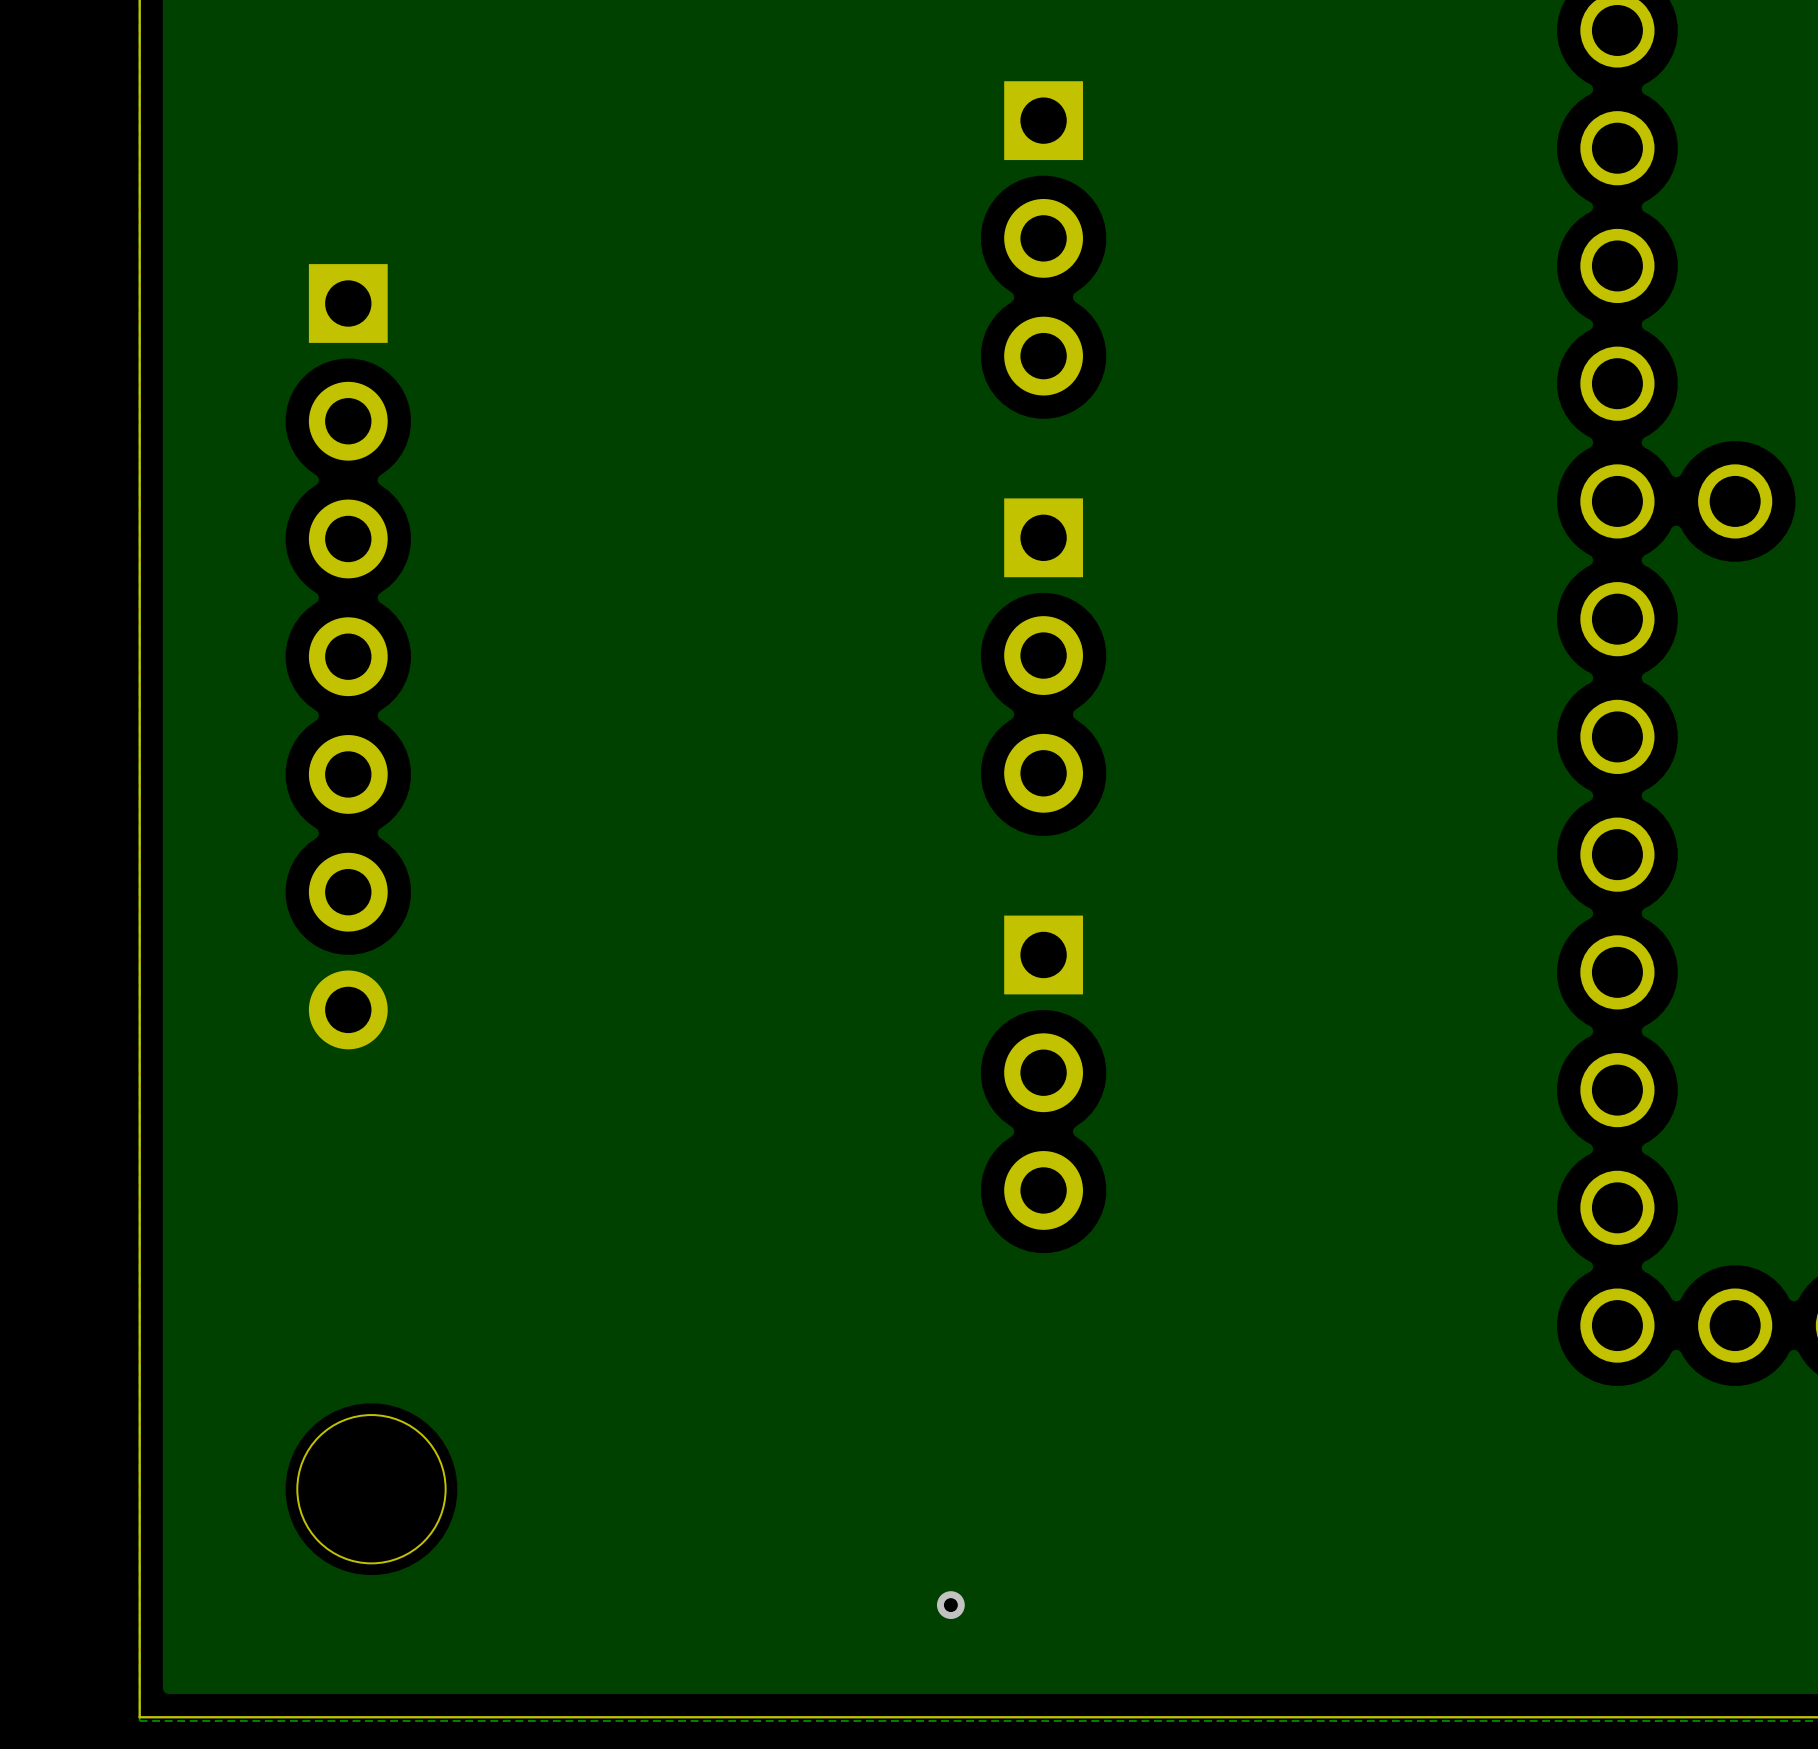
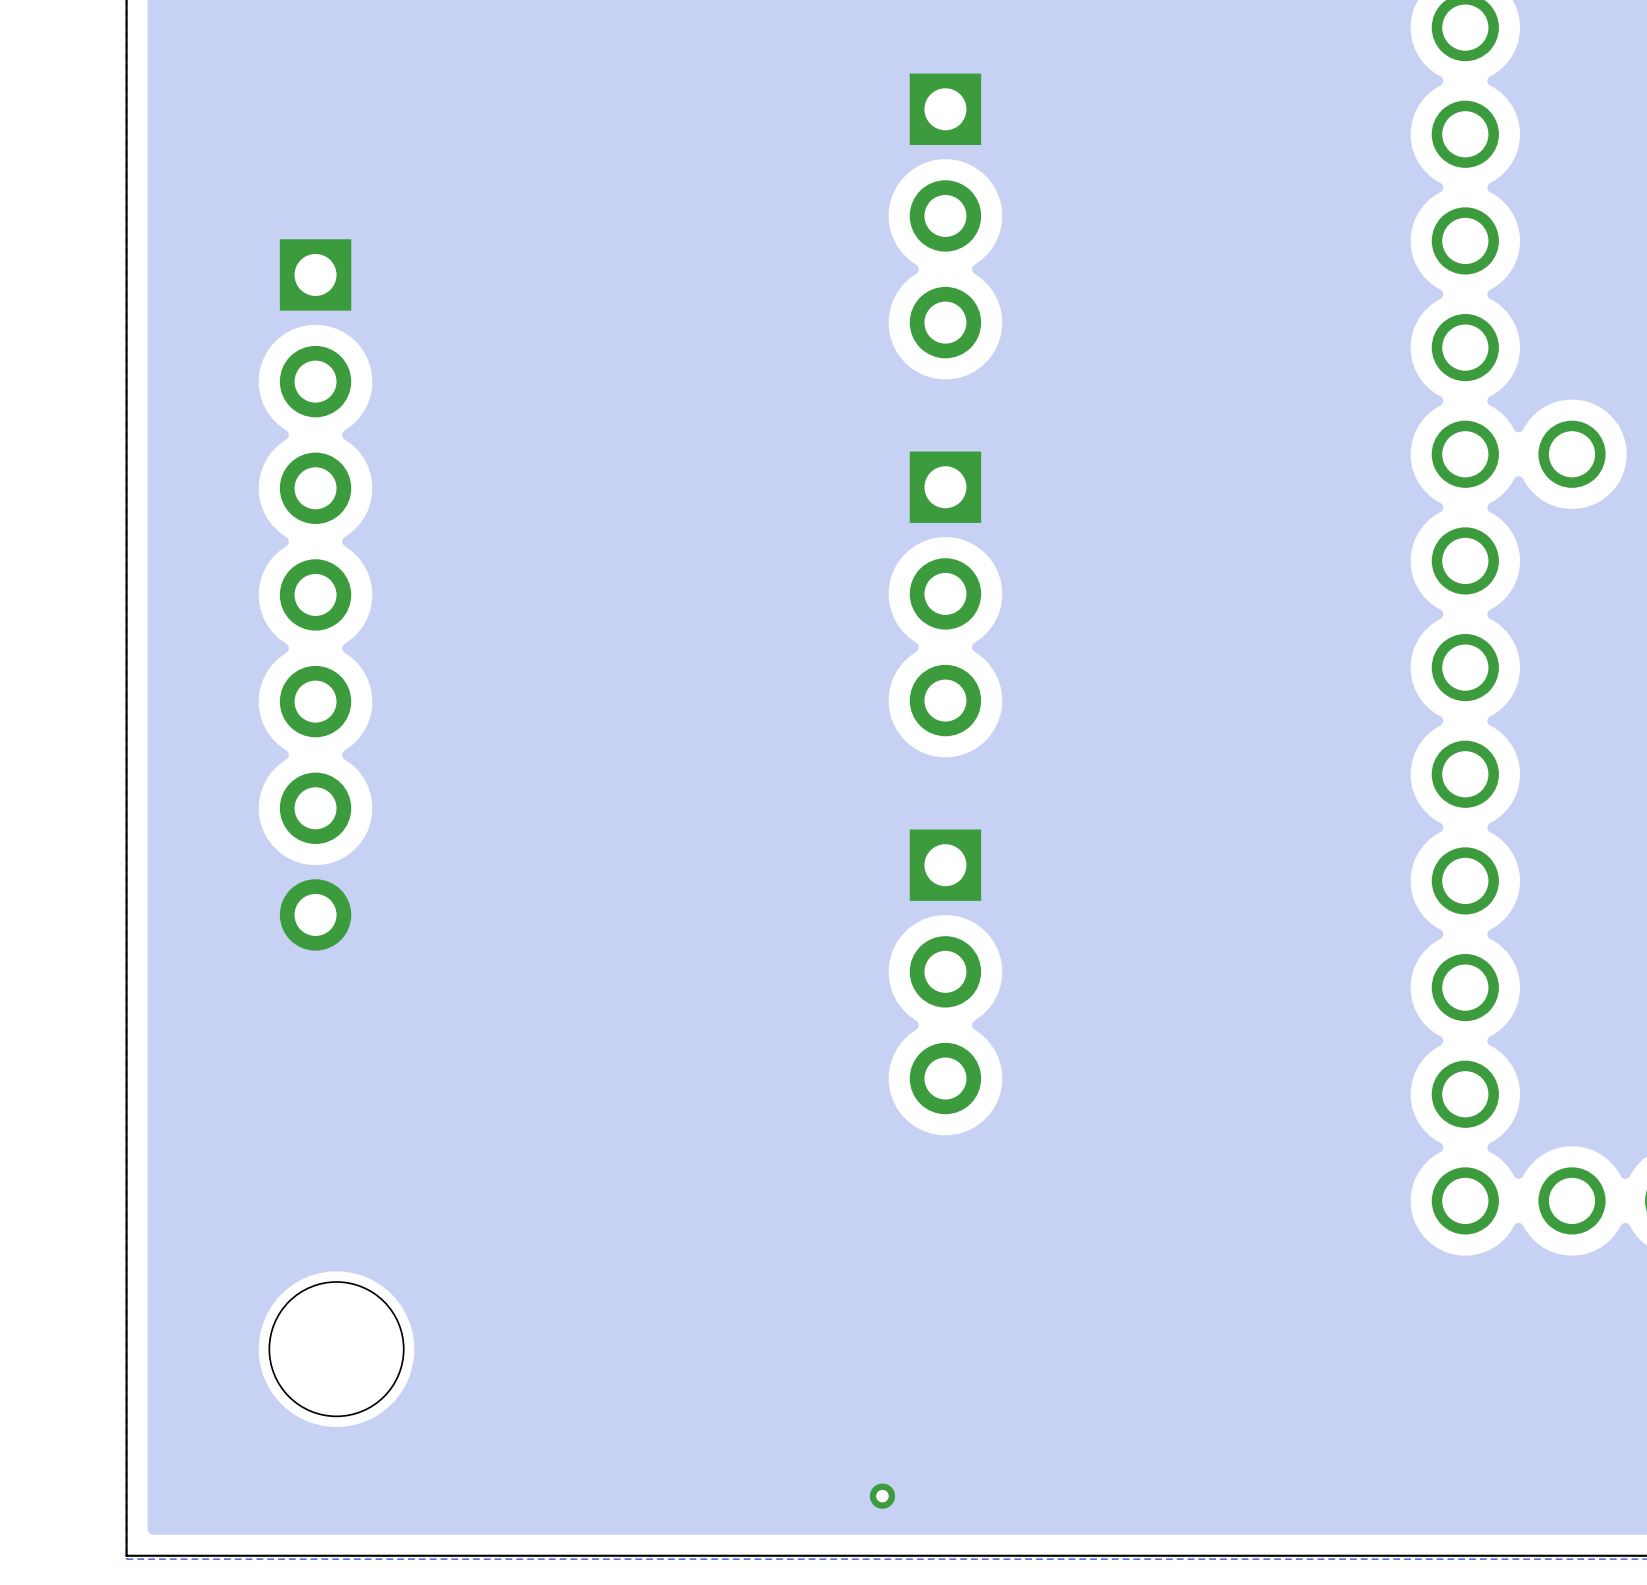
via position: (950, 1605) -> (882, 1496)

